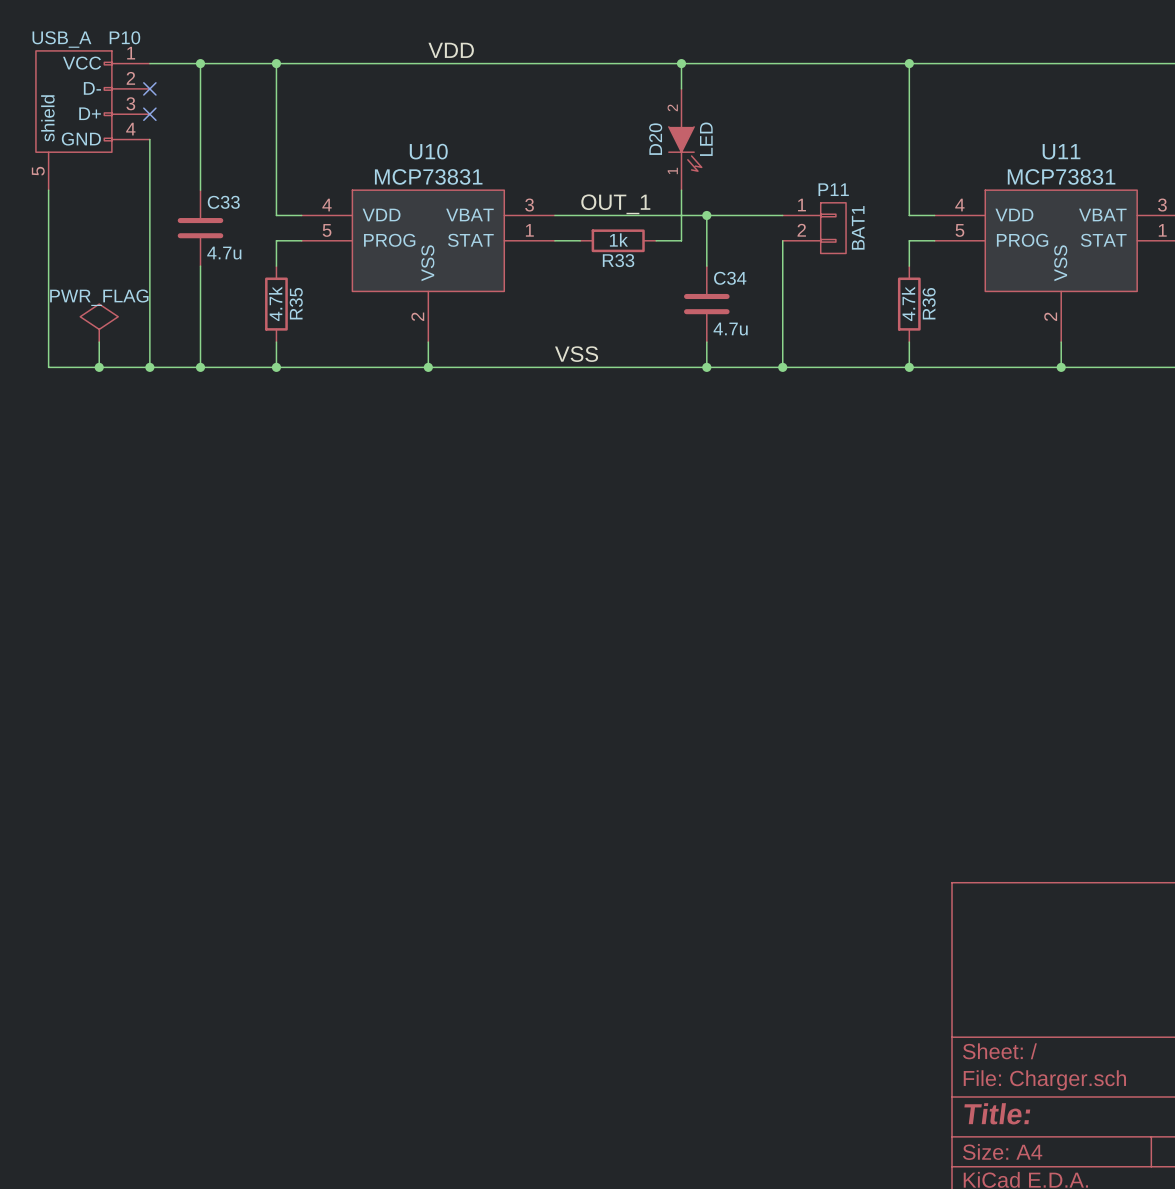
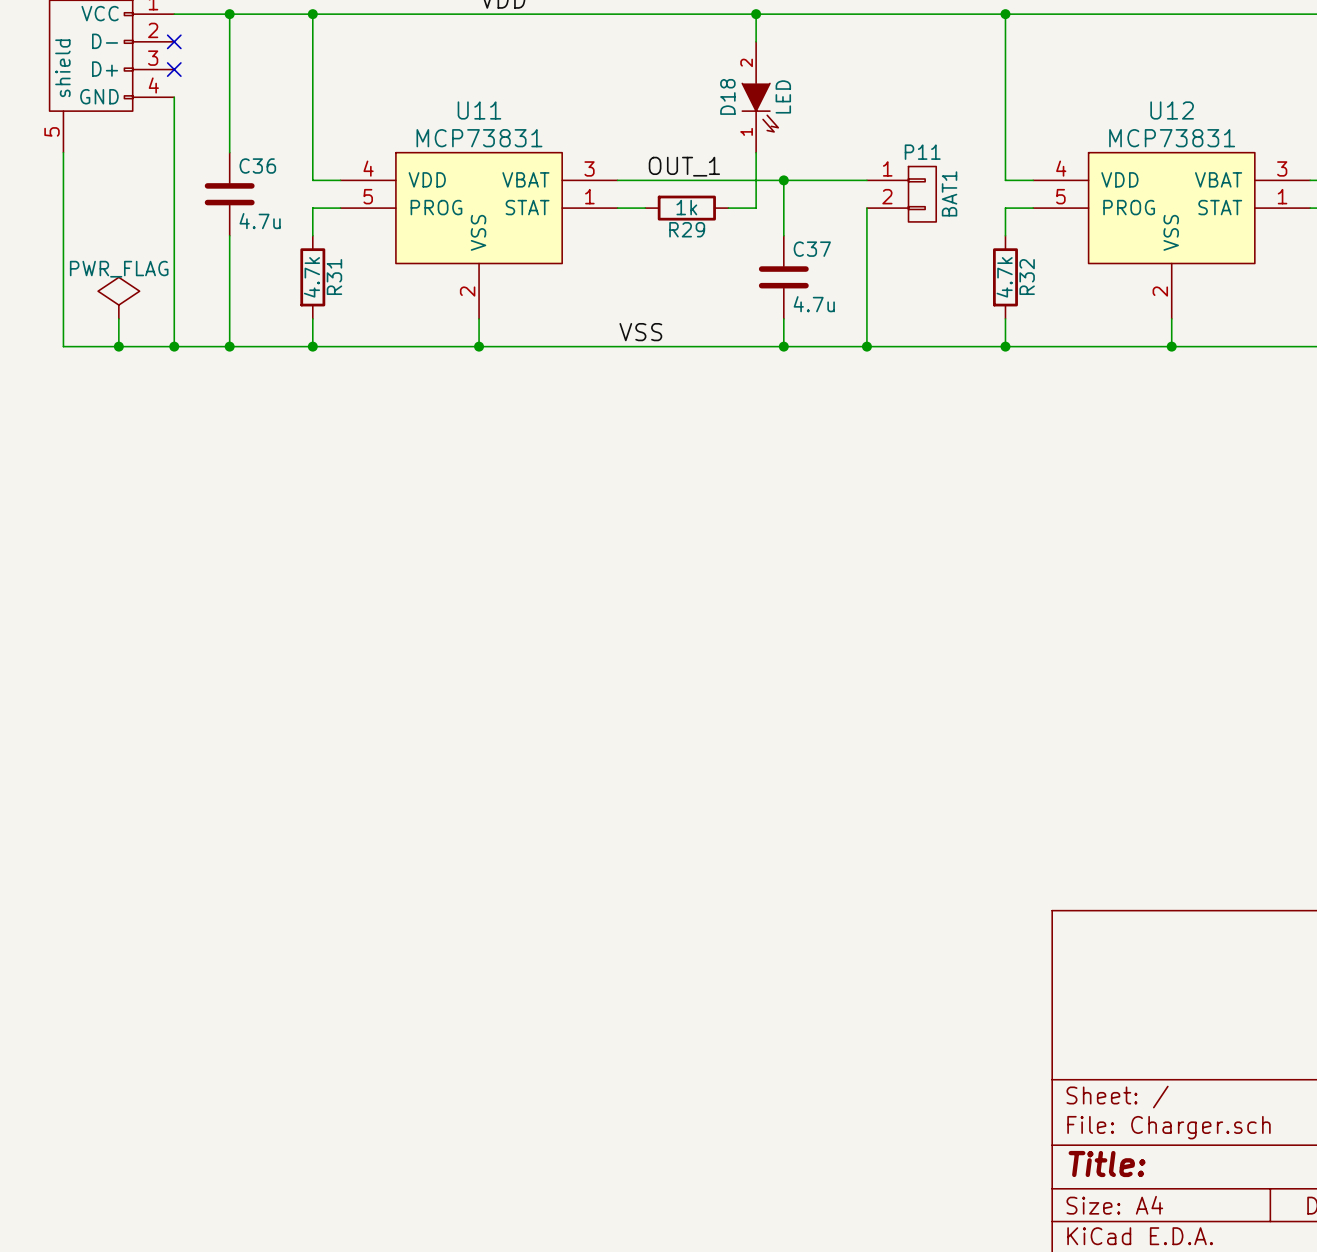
D20 name: D20 (655, 139) -> D18 (727, 96)
U10 name: U10 (428, 151) -> U11 (479, 110)
U11 name: U11 (1061, 151) -> U12 (1172, 110)
C33 name: C33 (223, 202) -> C36 (257, 166)
R33 name: R33 (618, 260) -> R29 (687, 229)
C34 name: C34 (730, 278) -> C37 (812, 249)
R35 name: R35 (296, 303) -> R31 (334, 277)
R36 name: R36 (929, 303) -> R32 (1027, 277)

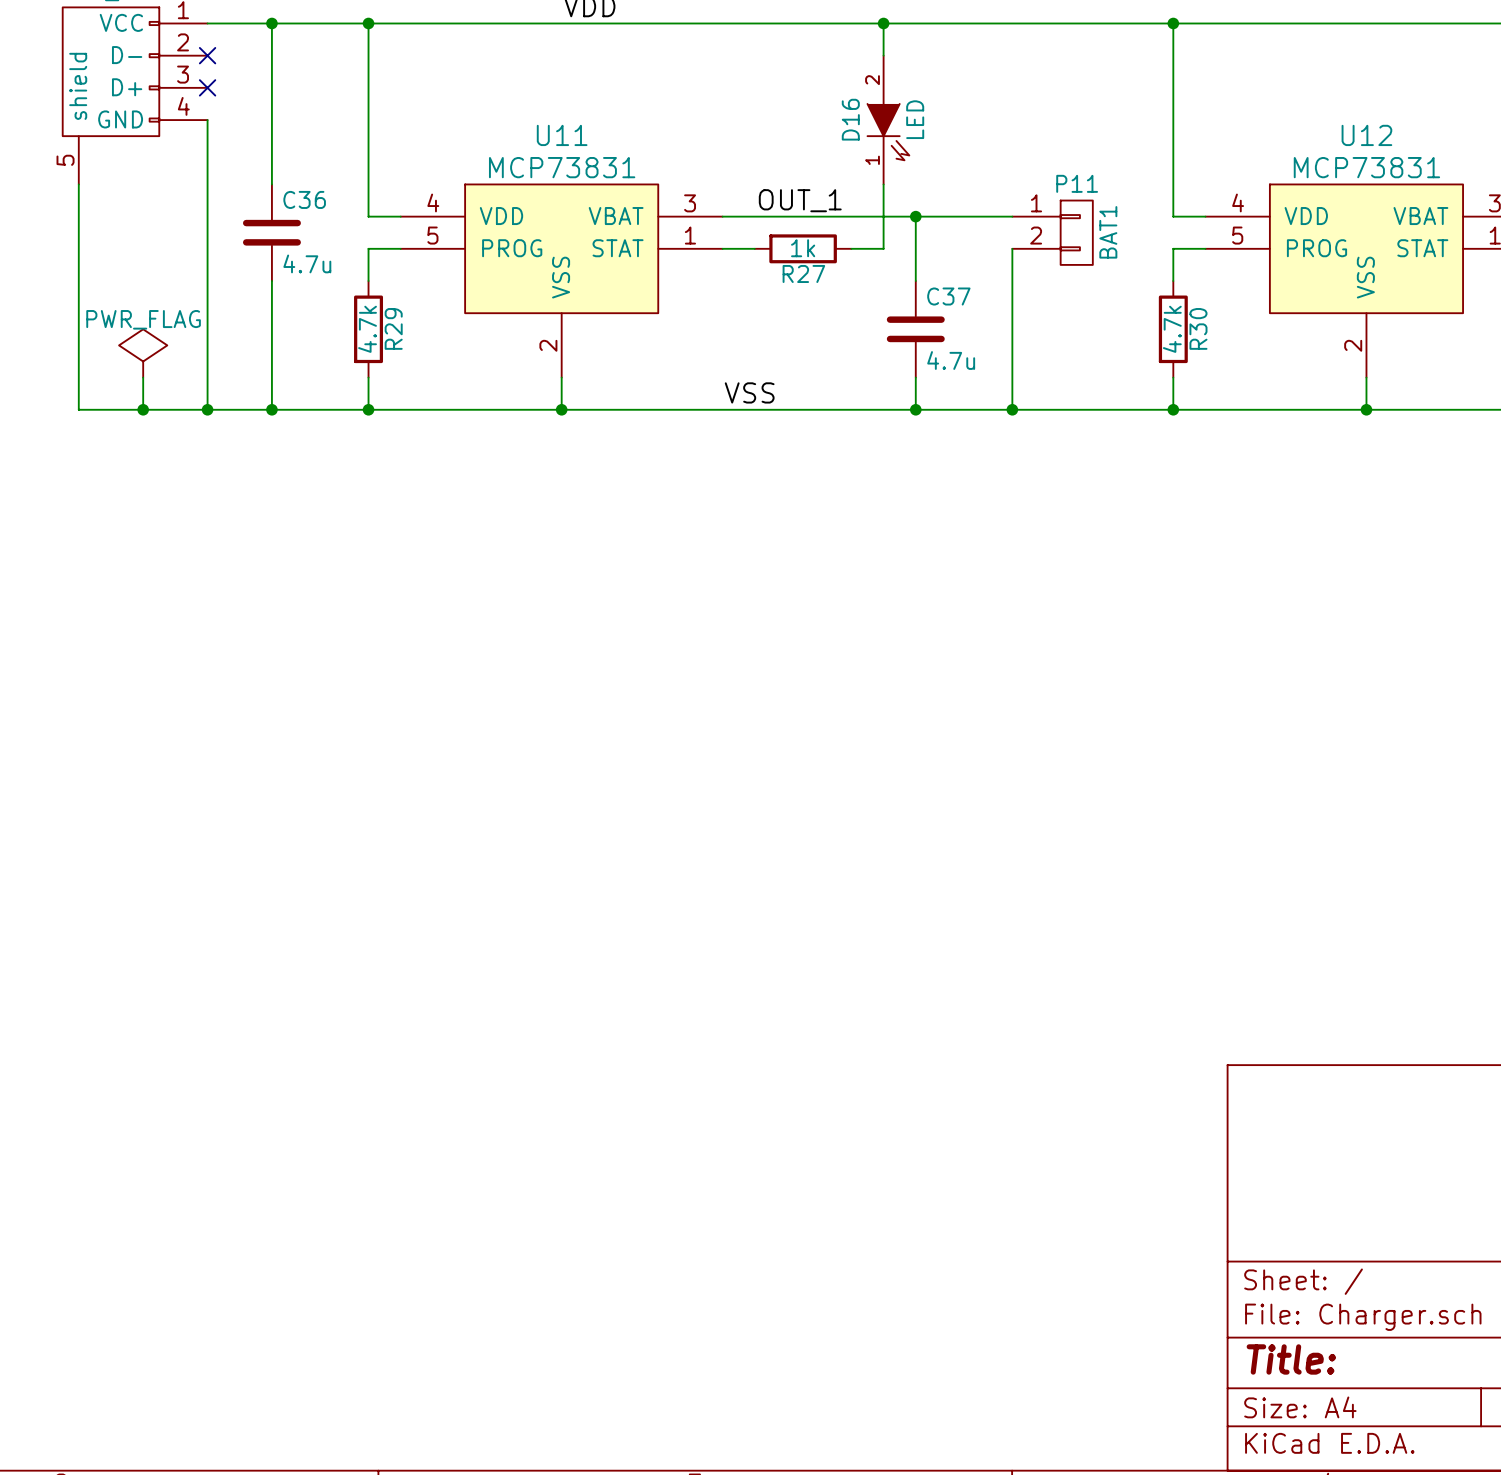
D18 name: D18 (727, 96) -> D16 (850, 119)
R29 name: R29 (687, 229) -> R27 (803, 273)
R31 name: R31 (334, 277) -> R29 (393, 328)
R32 name: R32 (1027, 277) -> R30 (1198, 328)

